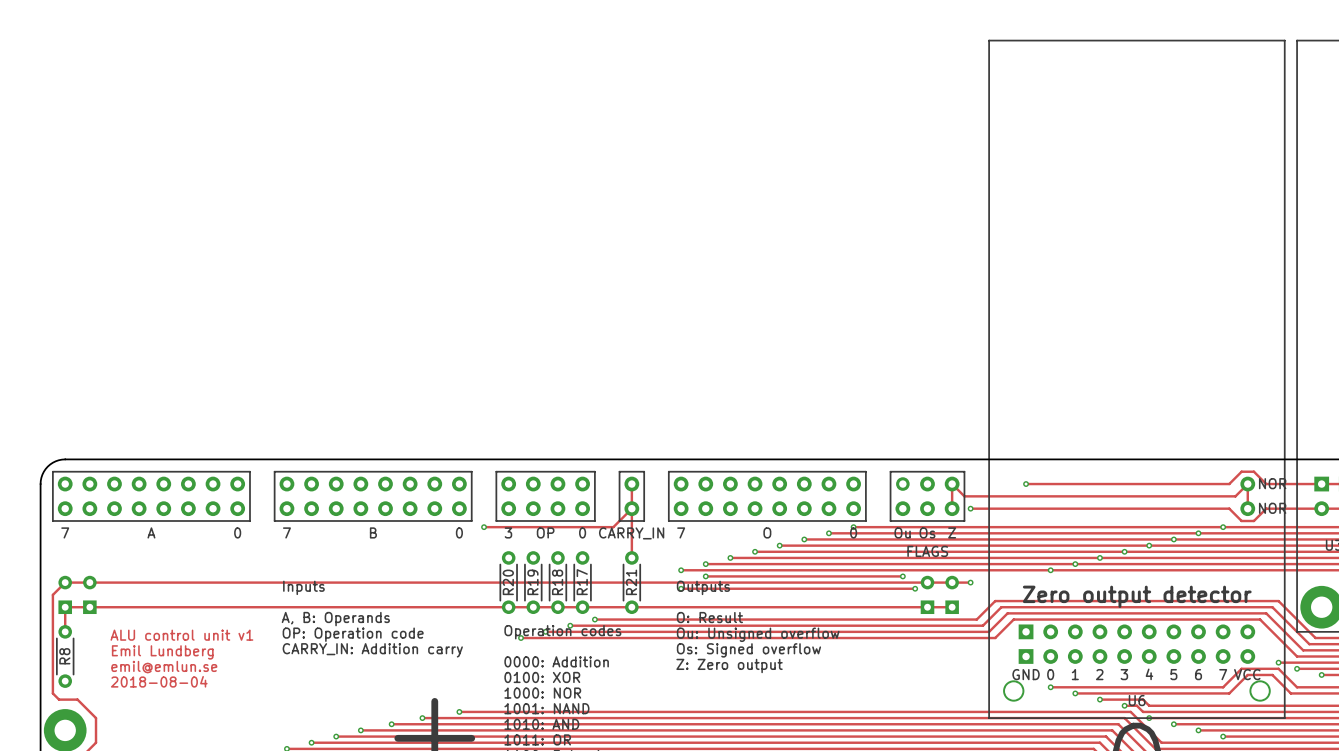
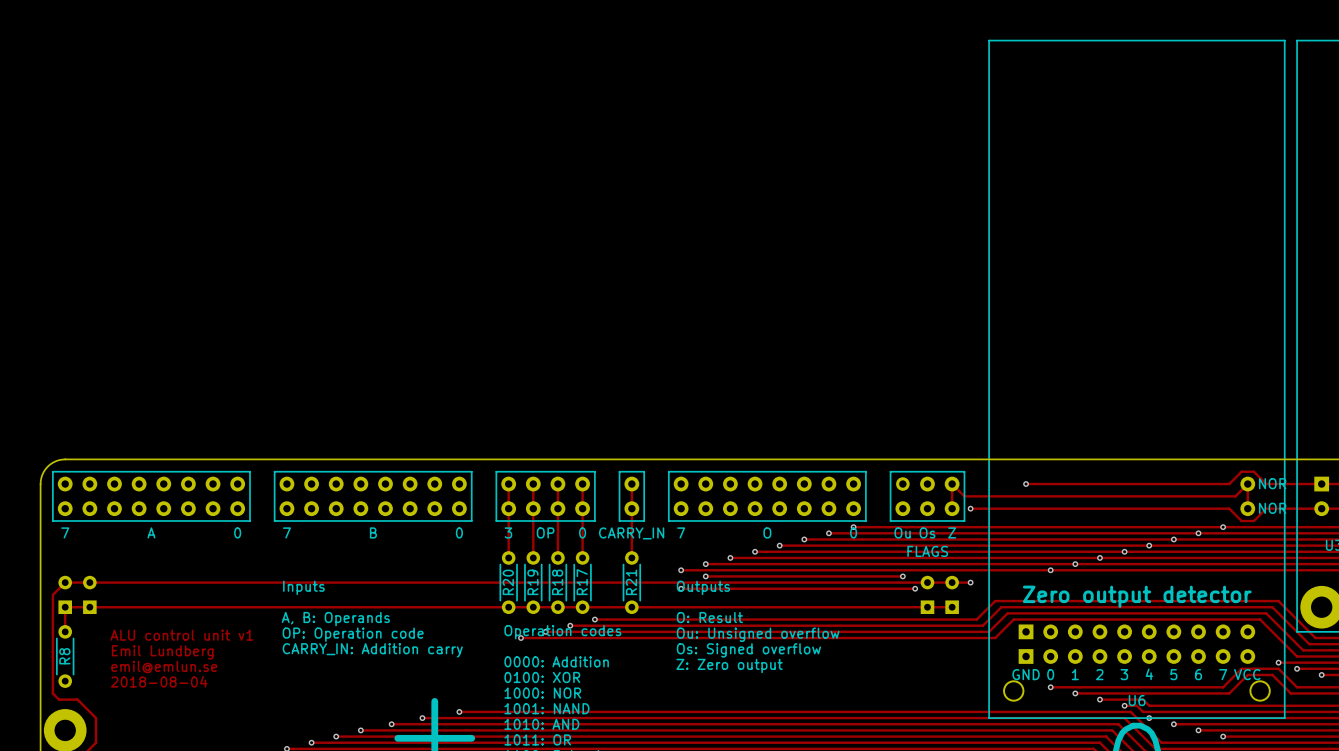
track: none -> (508, 484) (508, 557)
track: none -> (533, 484) (533, 557)
track: none -> (557, 484) (557, 557)
track: none -> (582, 484) (582, 557)
track: (631, 508) (613, 527) (484, 527) -> none
via: (484, 527) -> none

